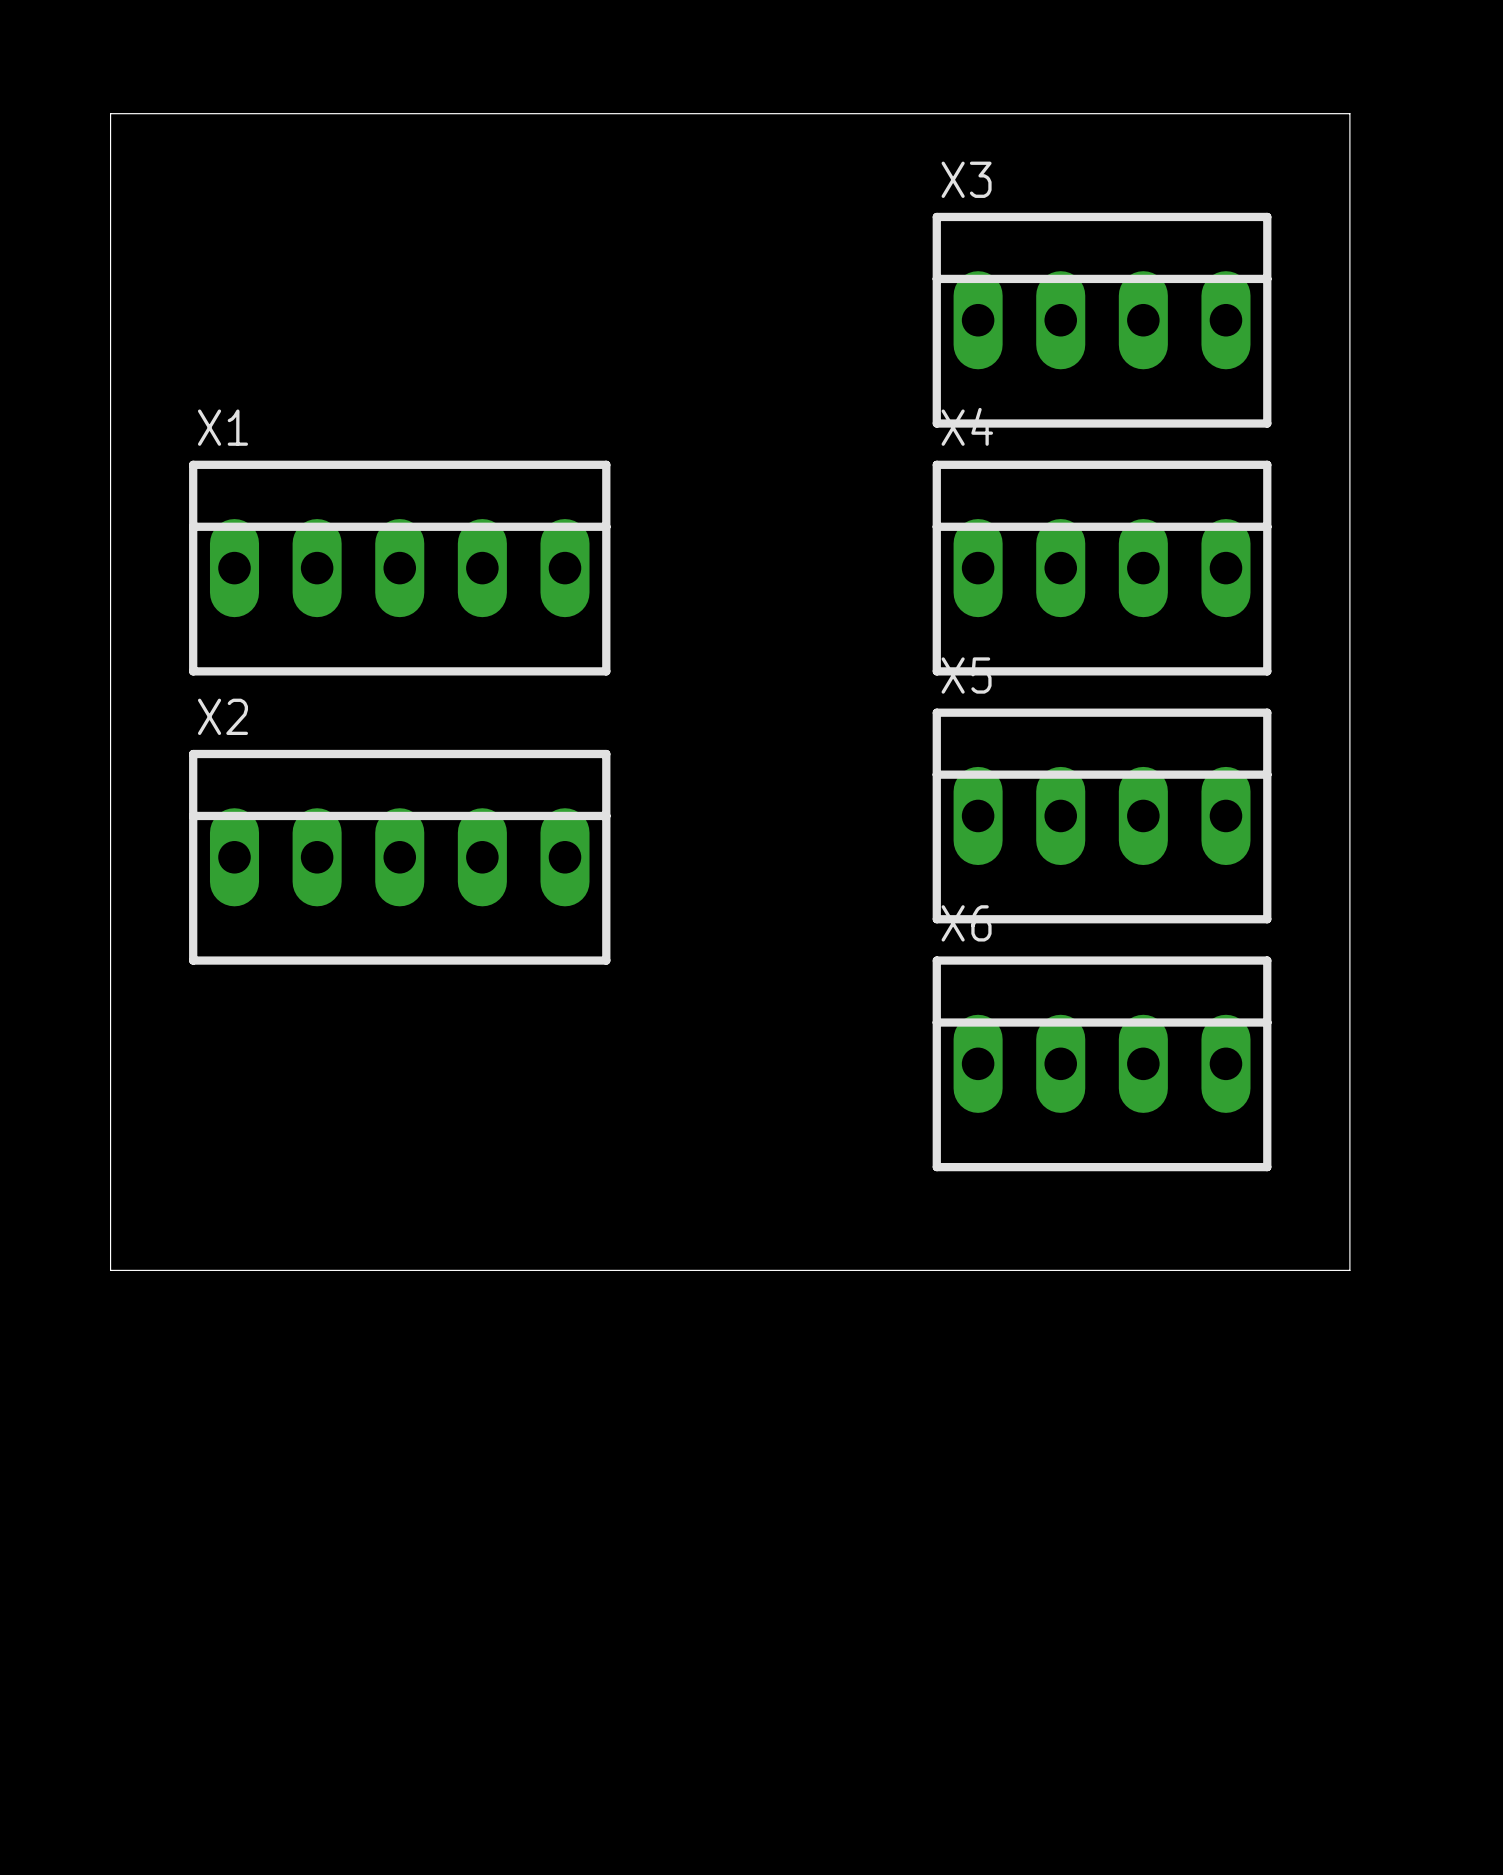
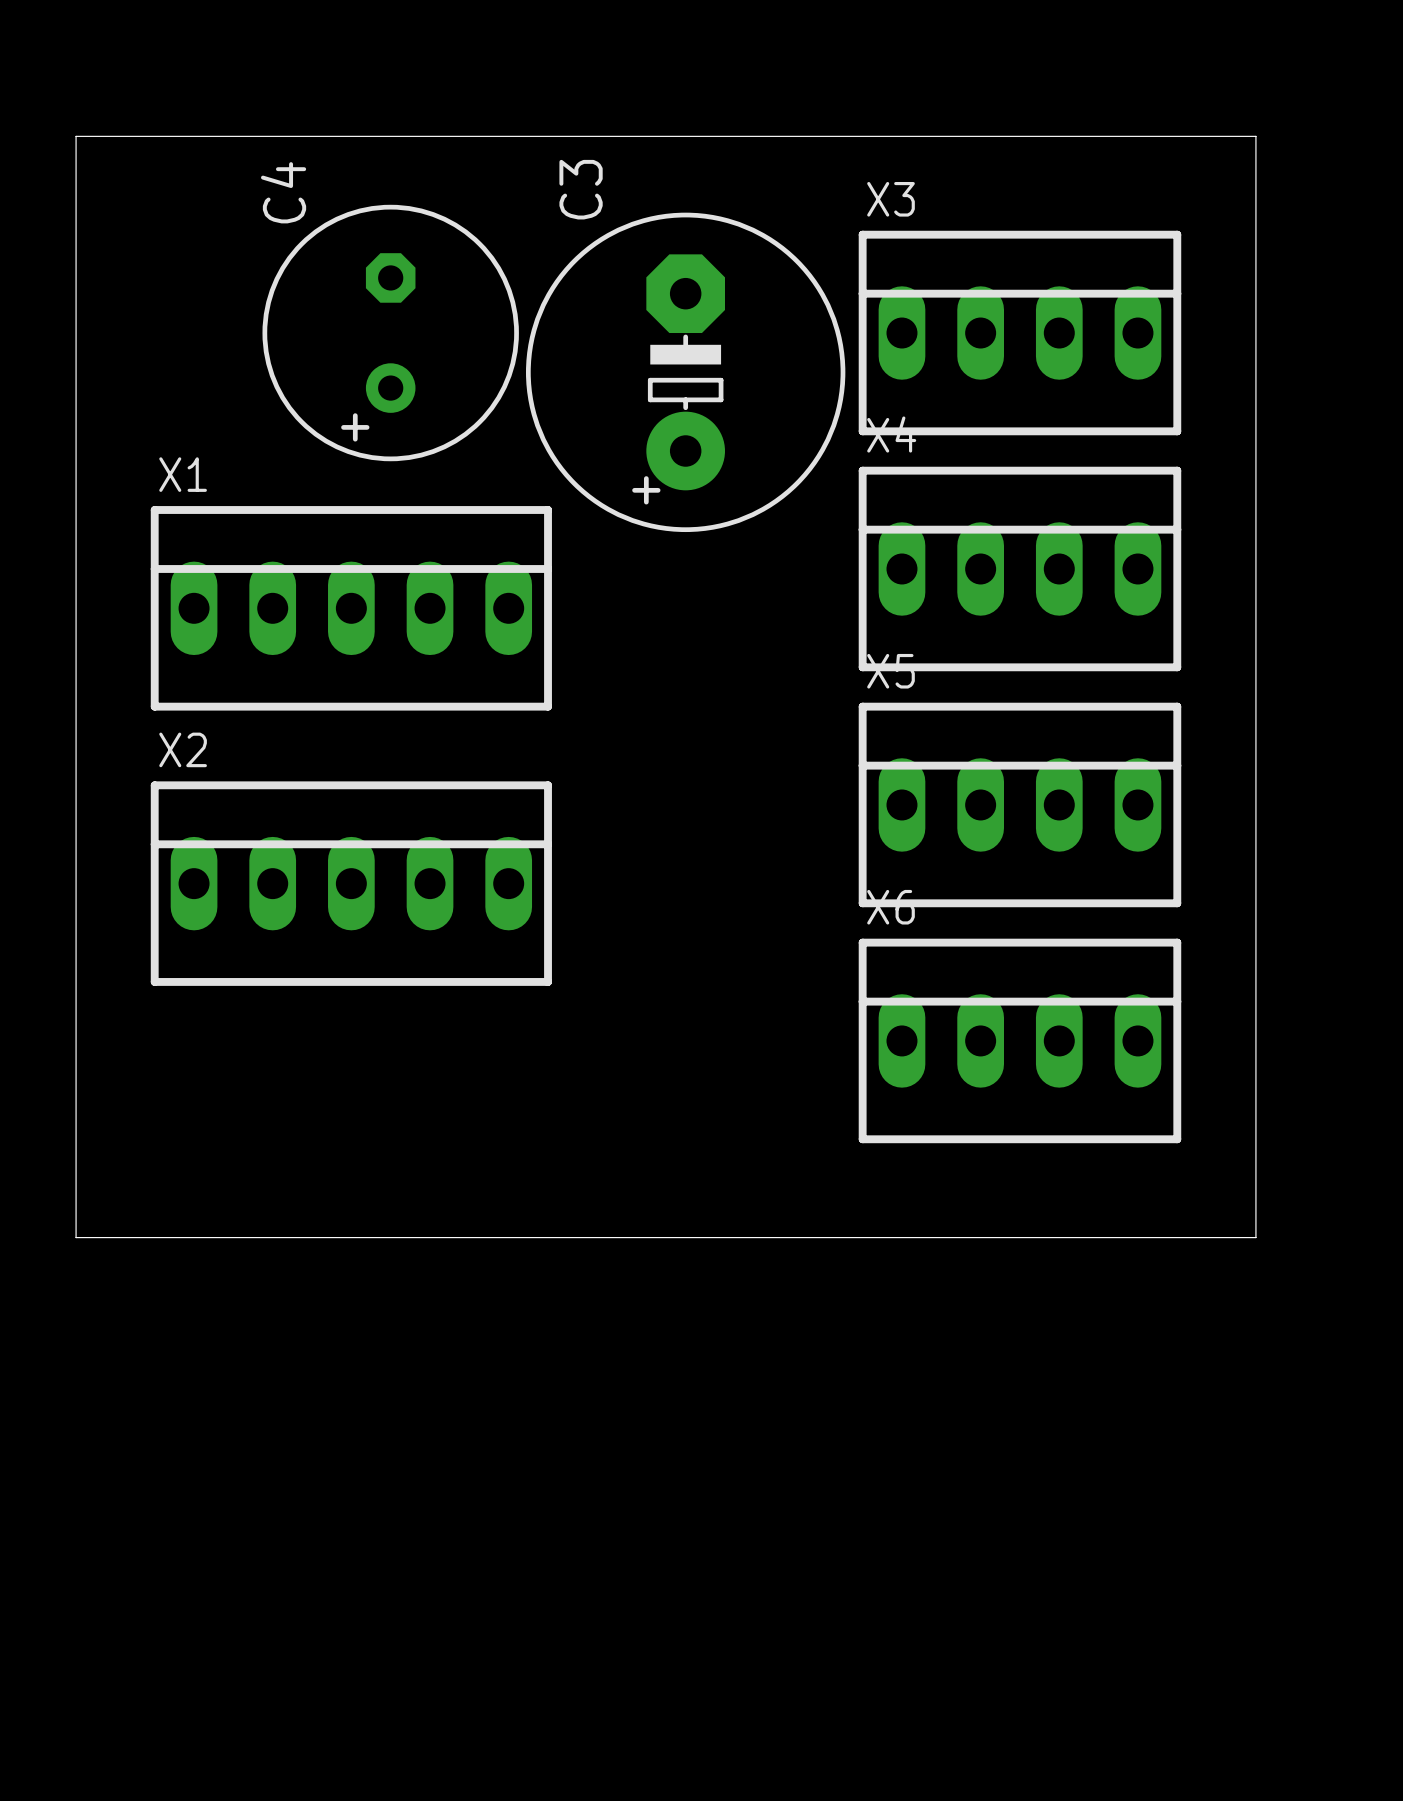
C4: none -> (390, 333)
C3: none -> (685, 372)
X1 position: (399, 568) -> (351, 608)
X2 position: (399, 857) -> (351, 883)

